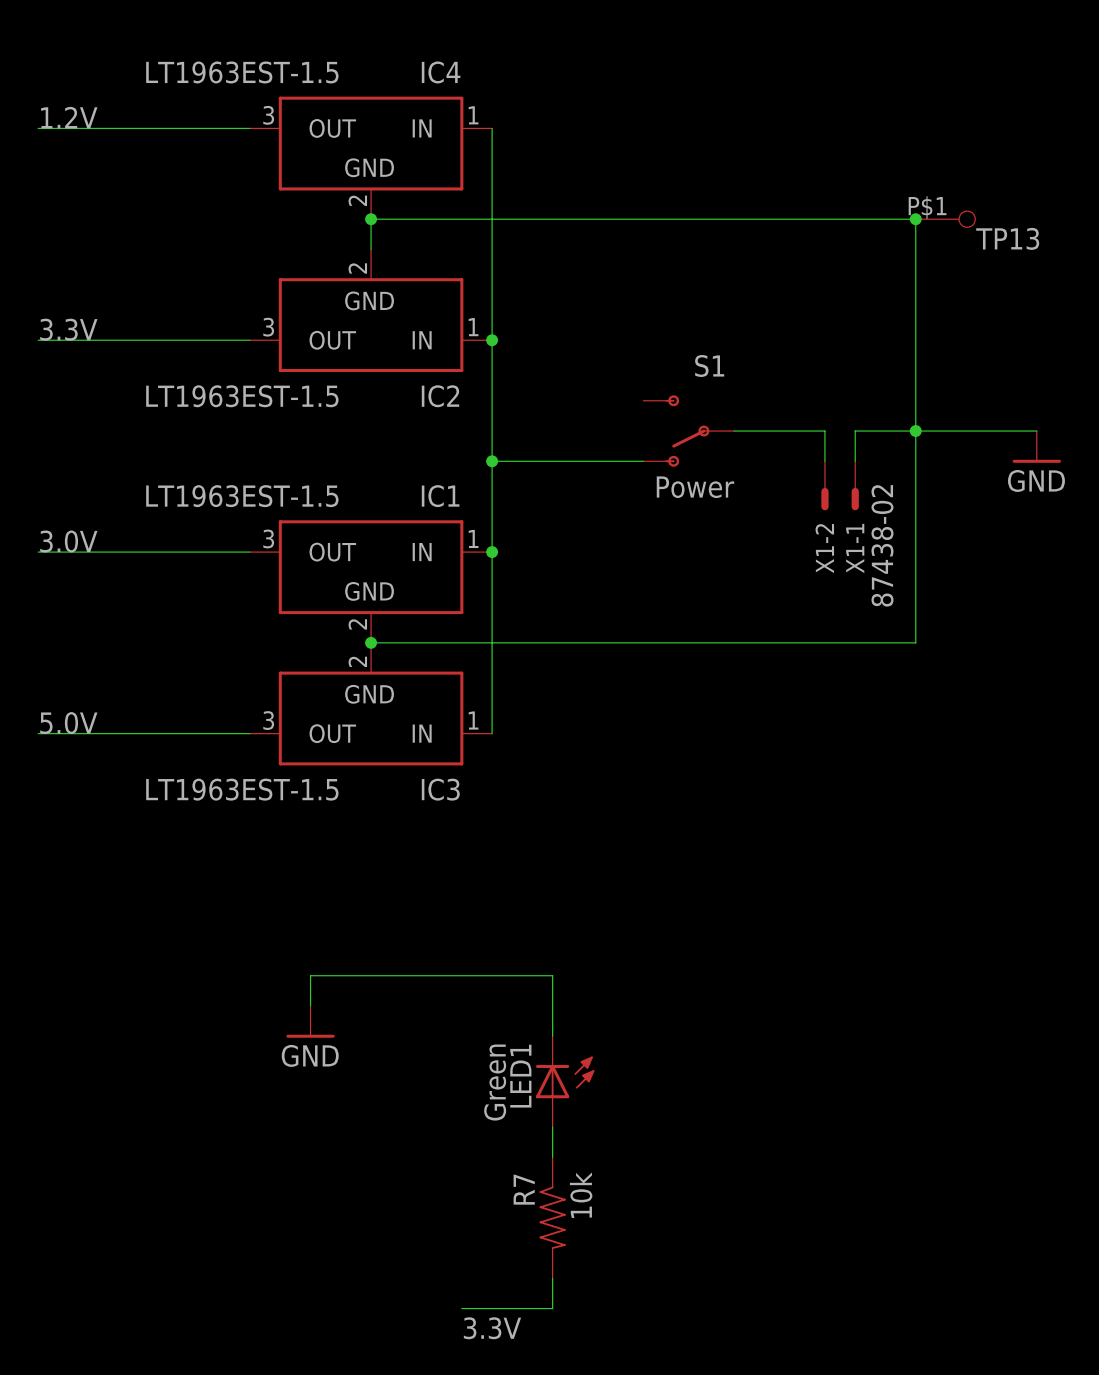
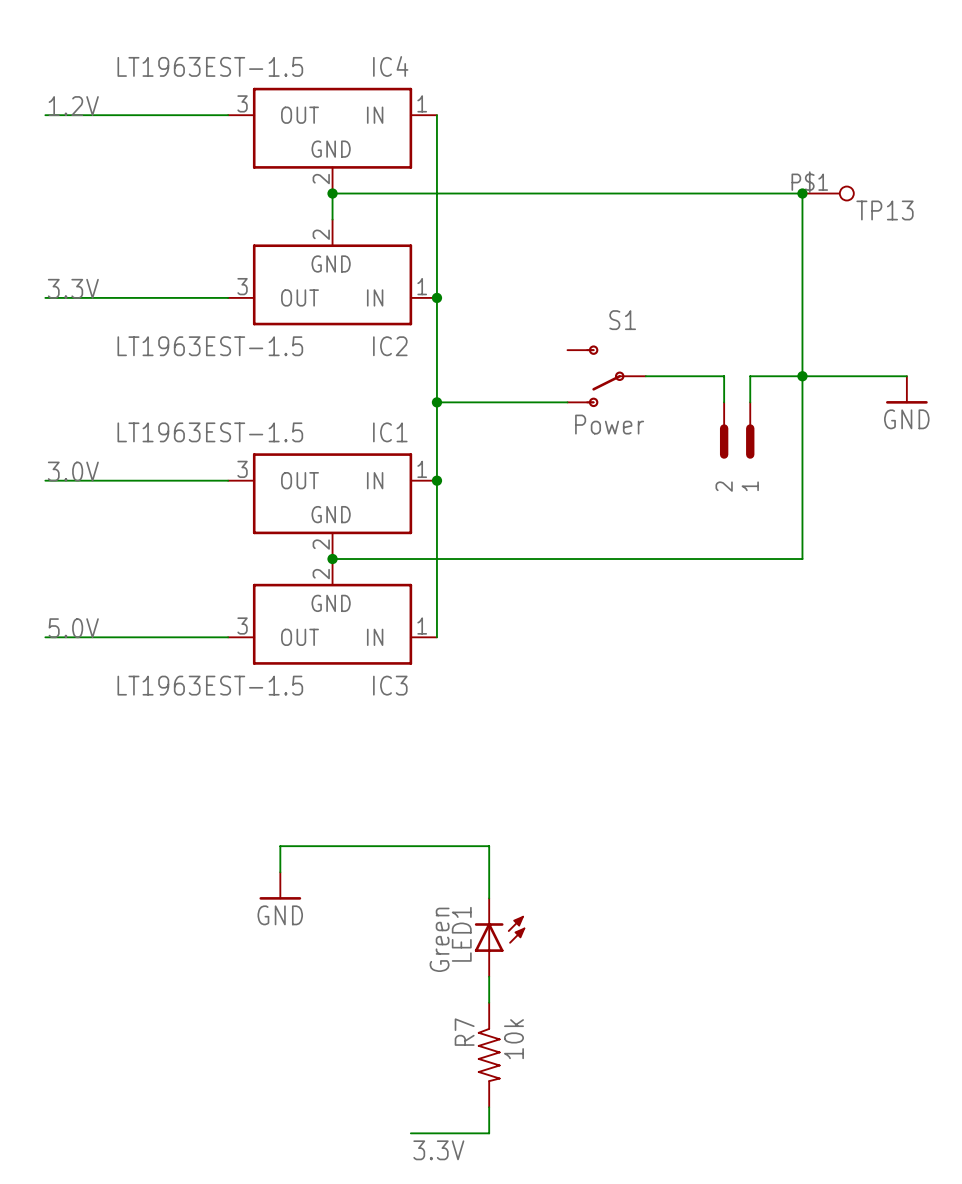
X1-2: (824, 485) -> none
X1-1: 87438-02 (855, 485) -> none
part: none -> (737, 430)

